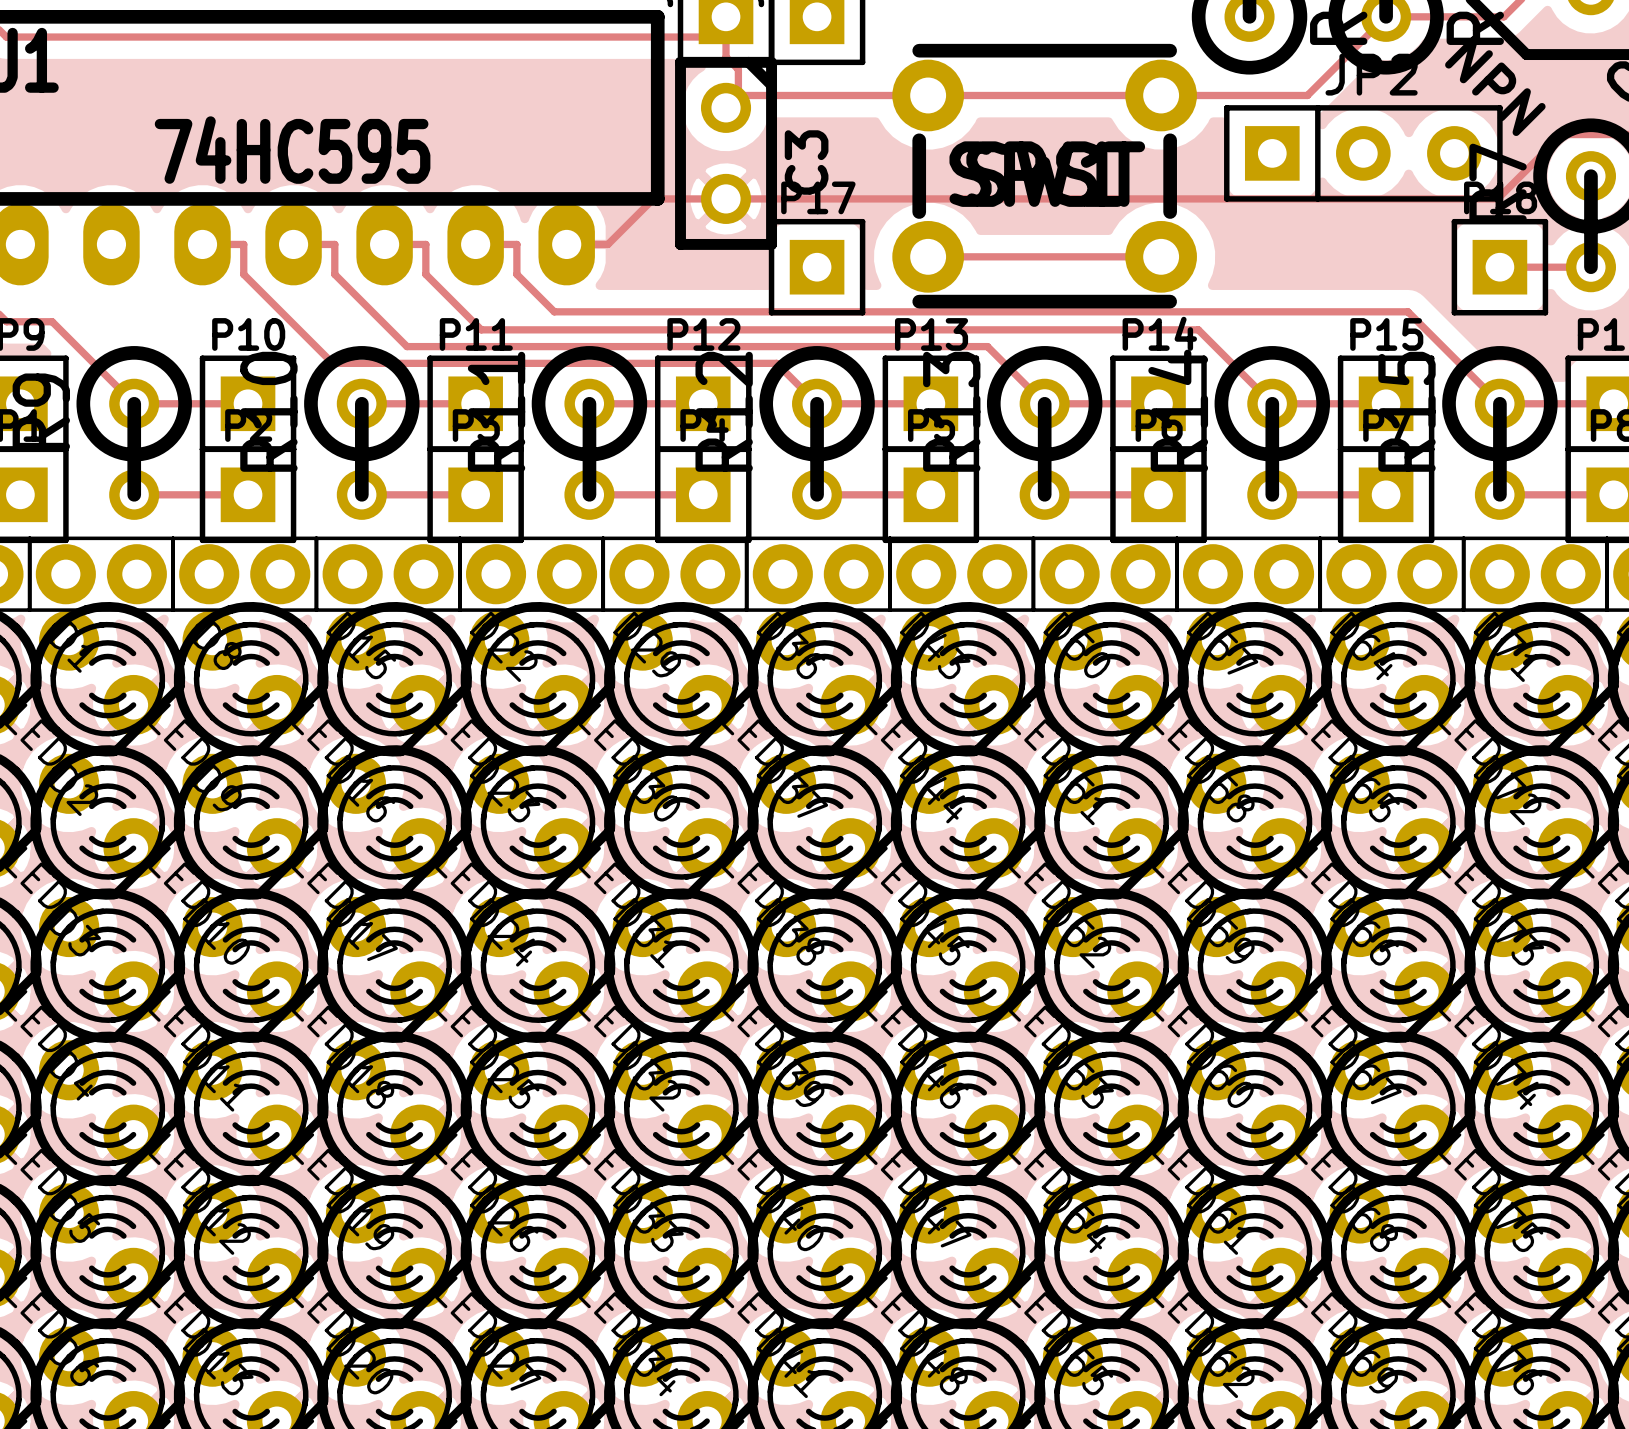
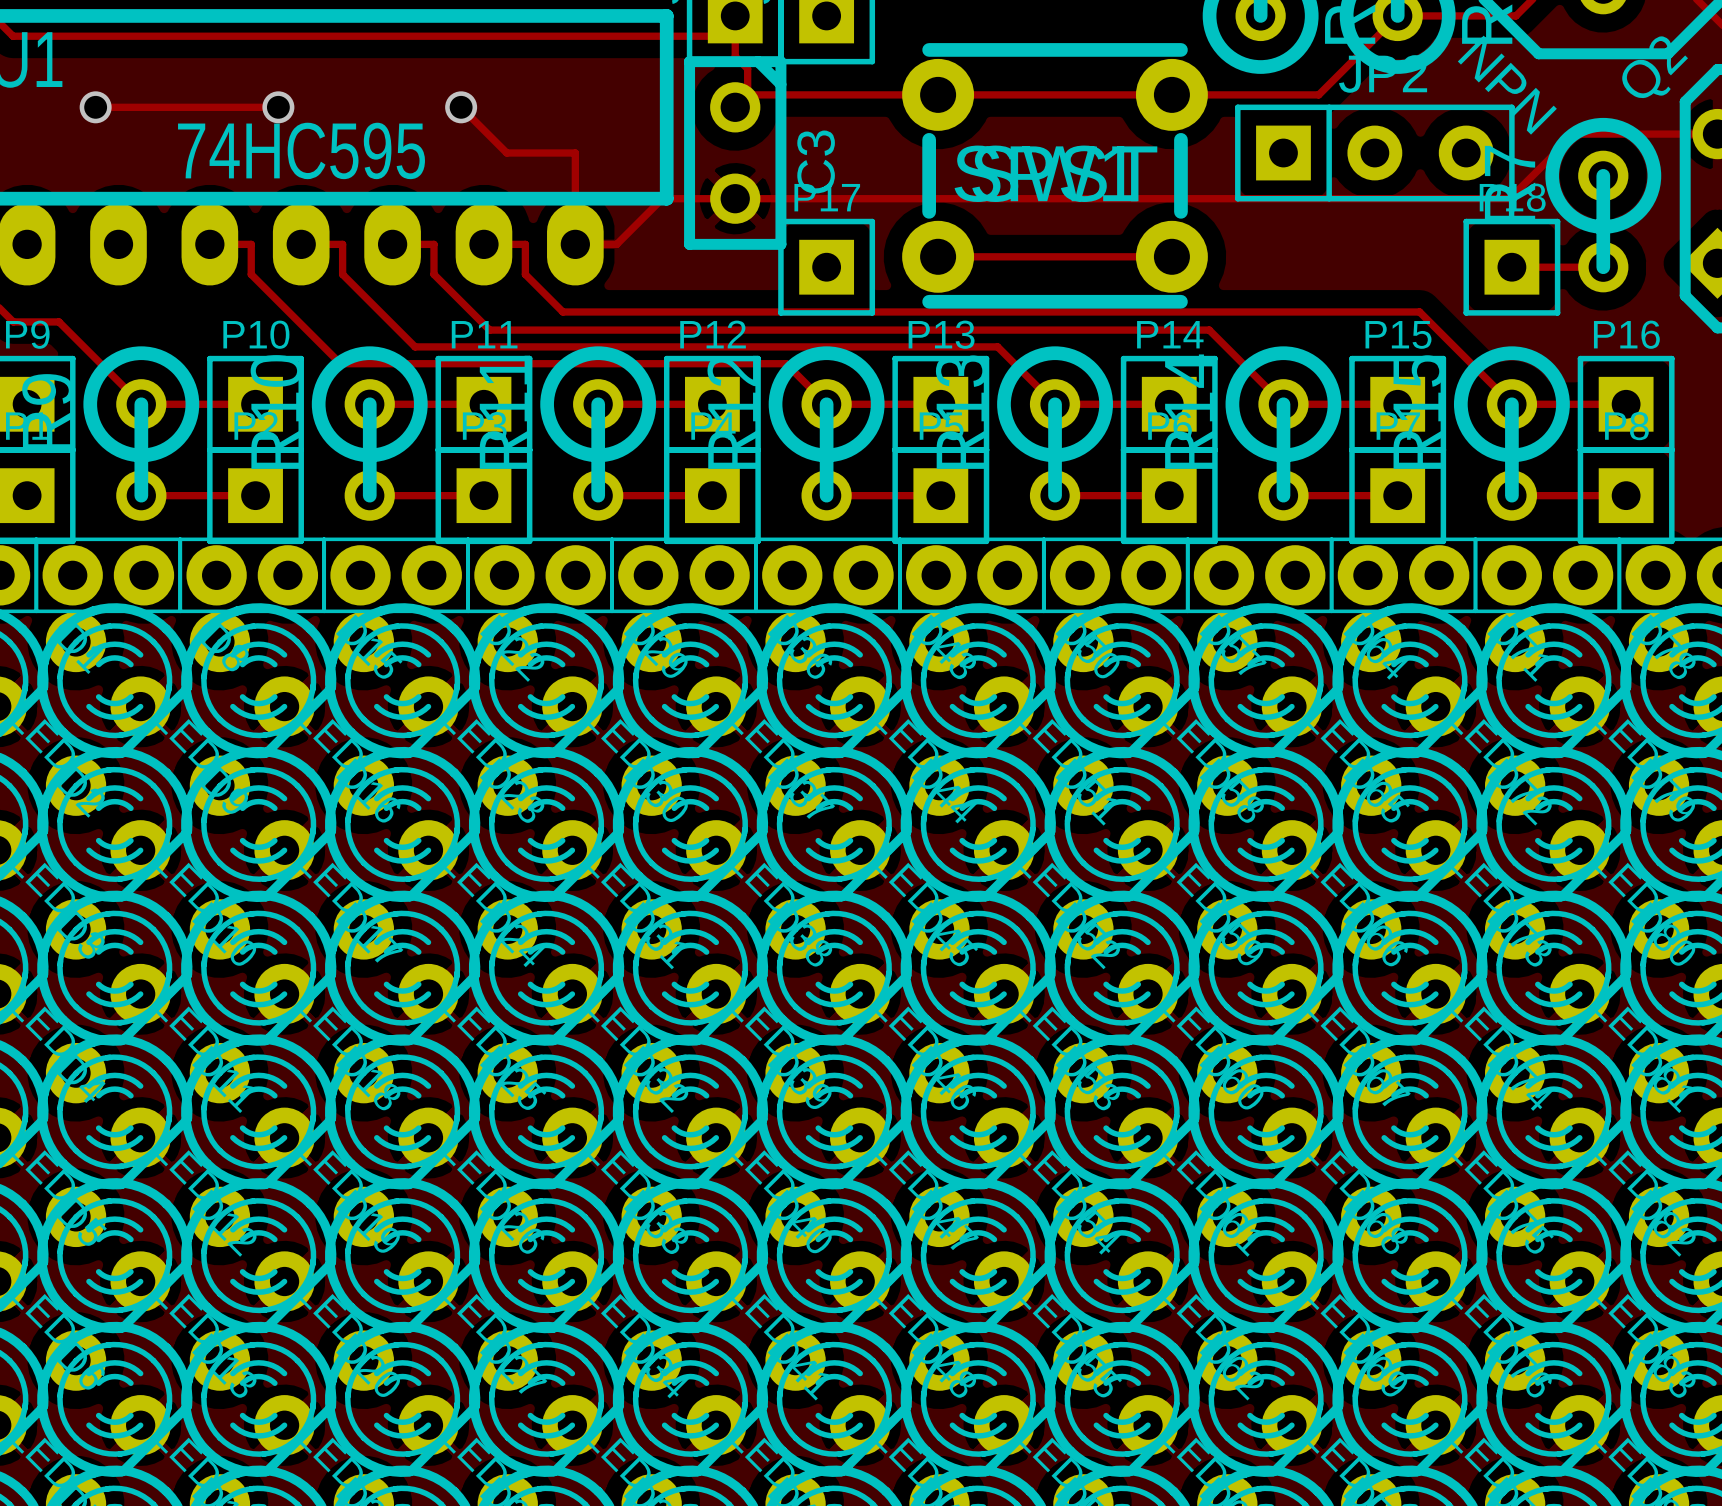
track: none -> (95, 107) (278, 107)
via: none -> (95, 107)
via: none -> (278, 107)
track: none -> (461, 107) (506, 153) (575, 153) (575, 244)
via: none -> (461, 107)

